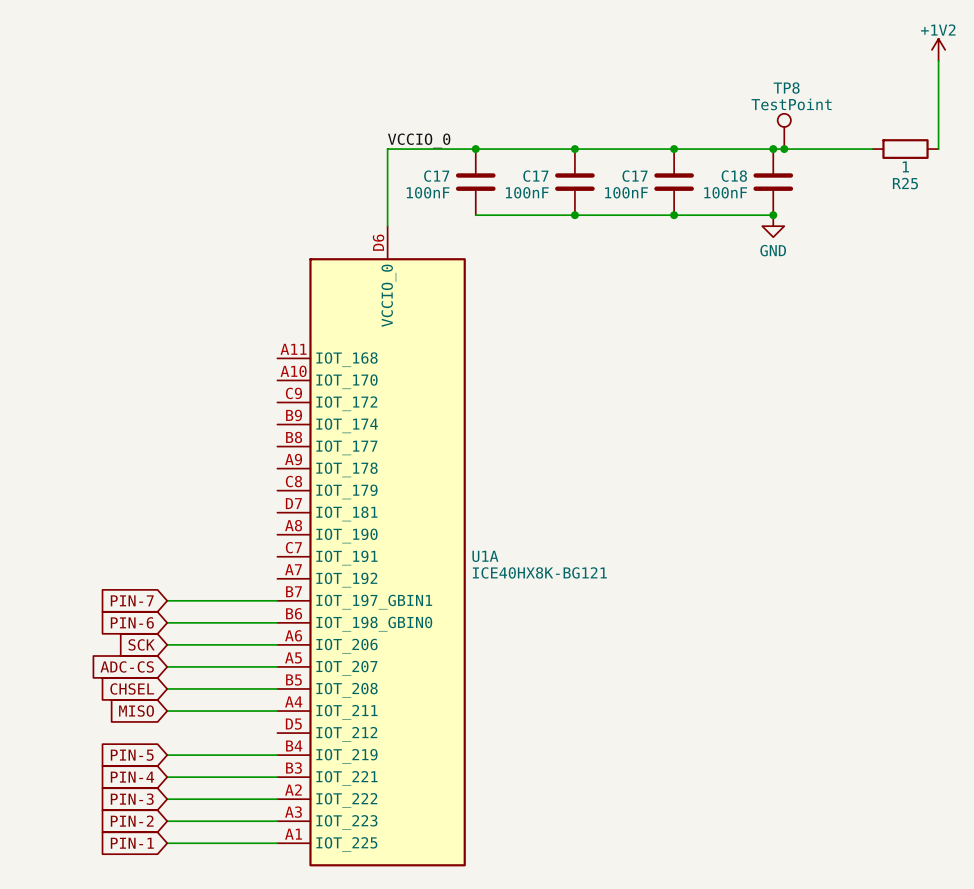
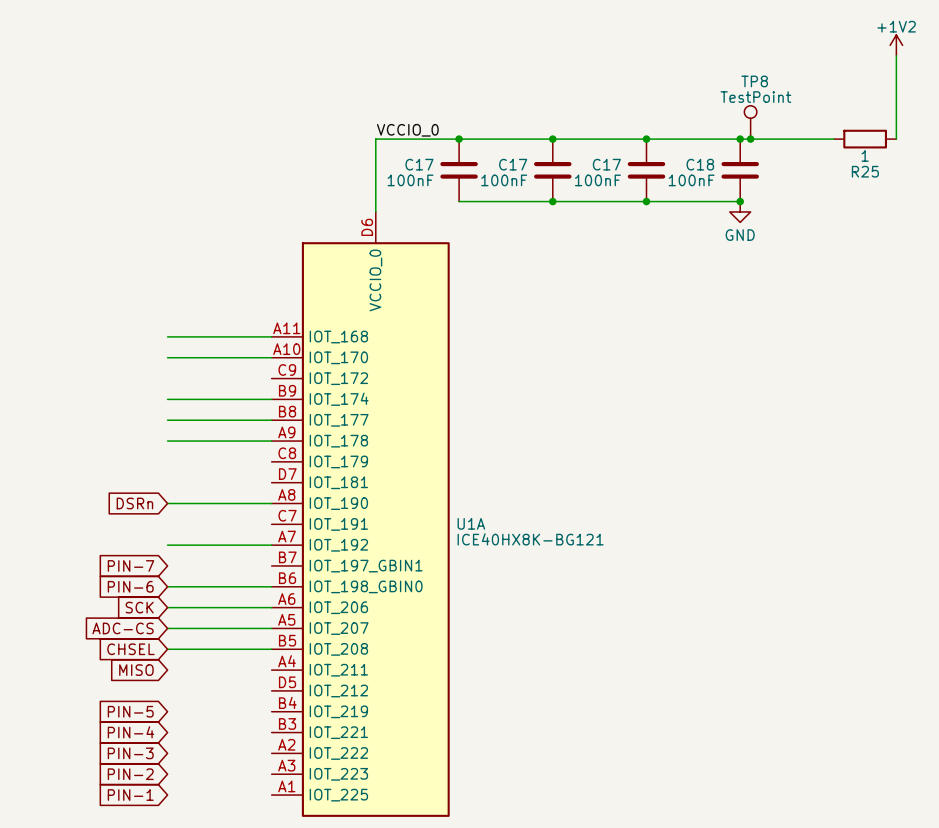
wire: none -> (167, 336) (271, 336)
wire: none -> (167, 357) (271, 357)
wire: none -> (167, 420) (271, 420)
wire: none -> (167, 441) (271, 441)
global label: none -> DSRn (134, 503)
wire: (167, 600) (277, 600) -> (167, 399) (271, 399)
wire: (167, 711) (277, 711) -> (167, 503) (271, 503)
wire: (167, 755) (277, 755) -> (167, 545) (271, 545)
wire: (167, 777) (277, 777) -> none
wire: (167, 799) (277, 799) -> none
wire: (167, 821) (277, 821) -> none
wire: (167, 843) (277, 843) -> none

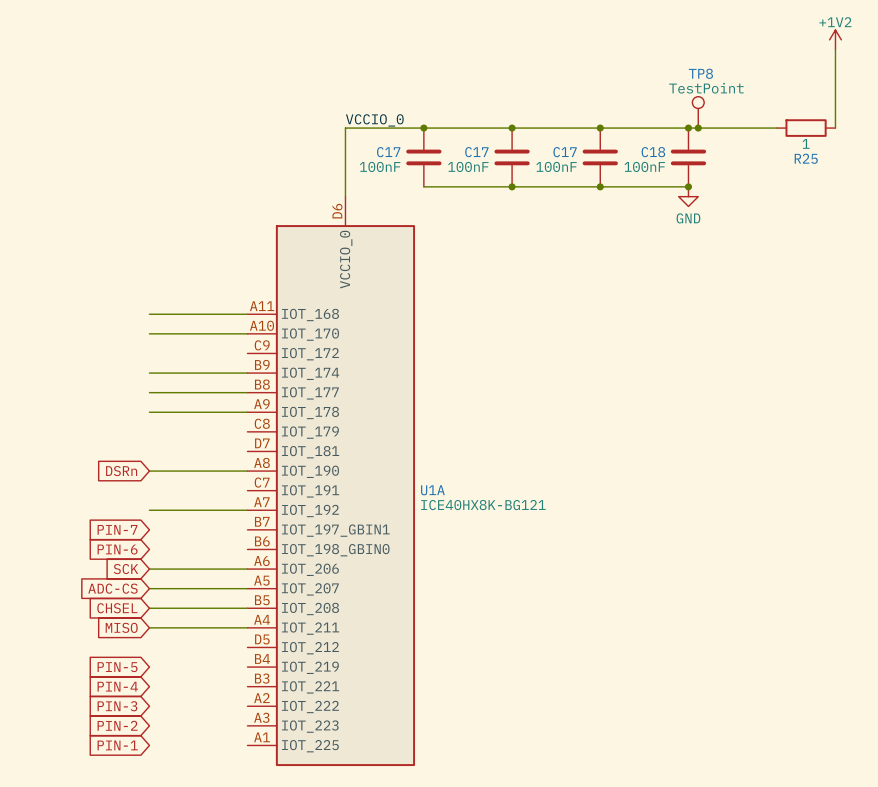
wire: (167, 586) (271, 586) -> (149, 627) (247, 627)

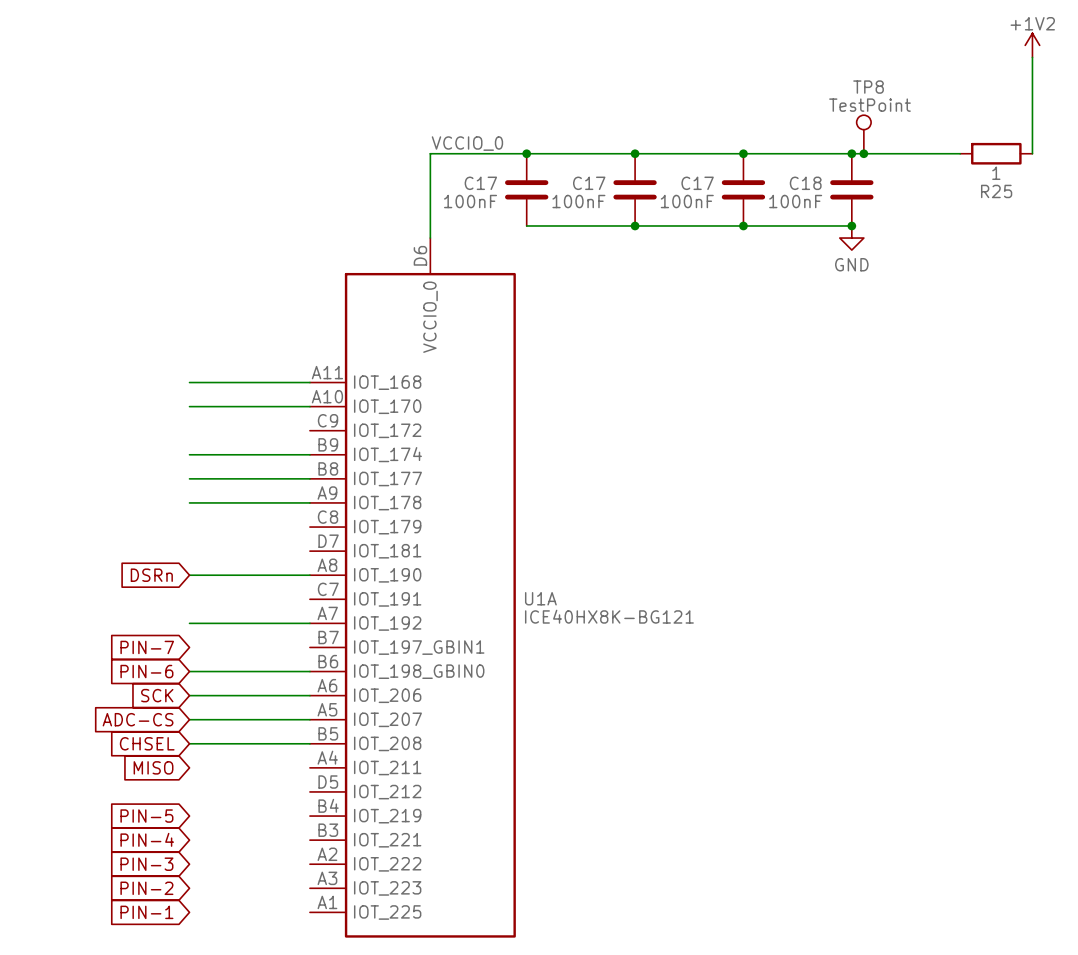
wire: (149, 627) (247, 627) -> (189, 671) (309, 671)

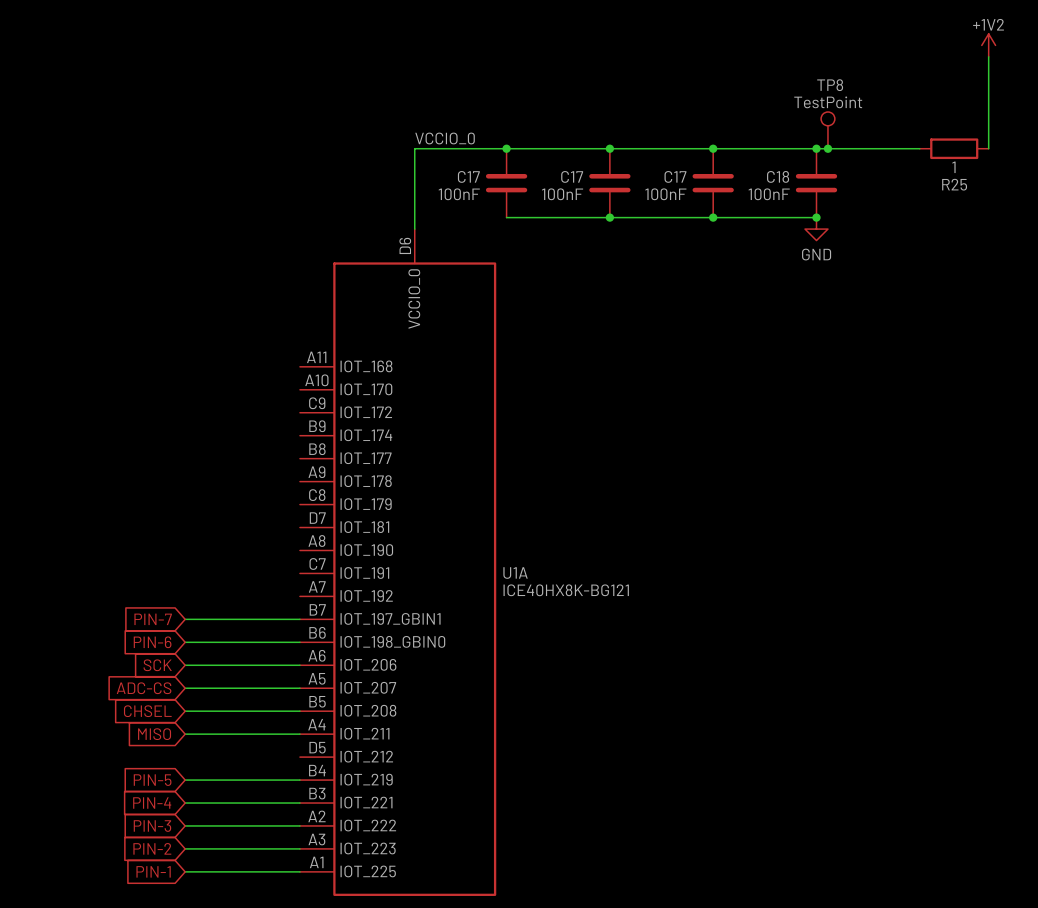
wire: (189, 382) (309, 382) -> none
wire: (189, 406) (309, 406) -> none
wire: (189, 454) (309, 454) -> (185, 619) (299, 619)
wire: (189, 478) (309, 478) -> none
wire: (189, 502) (309, 502) -> none
global label: DSRn (151, 575) -> none
wire: (189, 575) (309, 575) -> (185, 734) (299, 734)
wire: (189, 623) (309, 623) -> (185, 780) (299, 780)
wire: none -> (185, 803) (299, 803)
wire: none -> (185, 825) (299, 825)
wire: none -> (185, 848) (299, 848)
wire: none -> (185, 871) (299, 871)

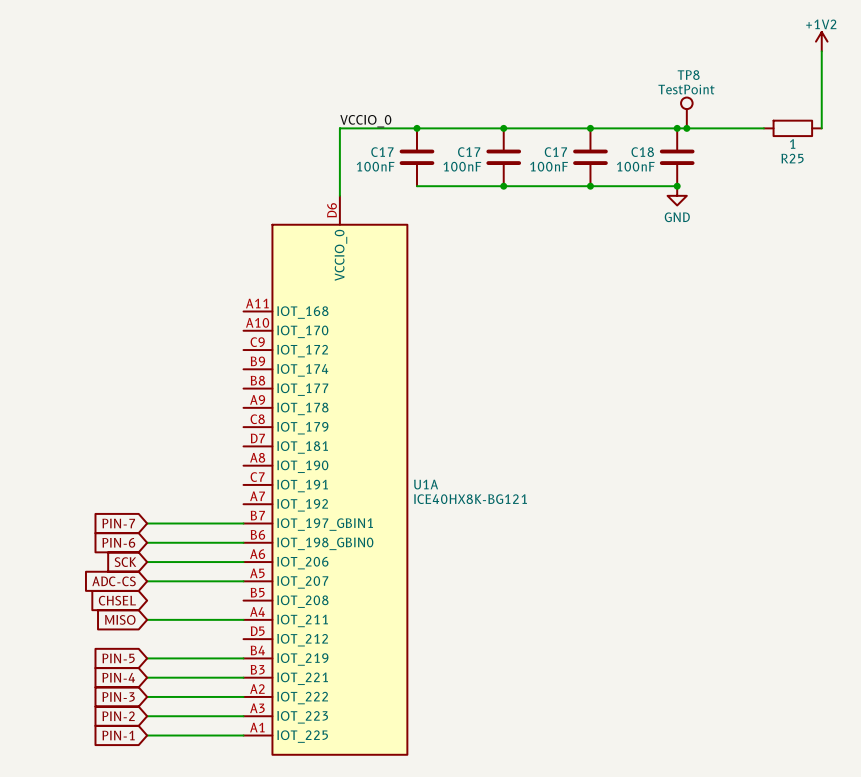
wire: (185, 711) (299, 711) -> none

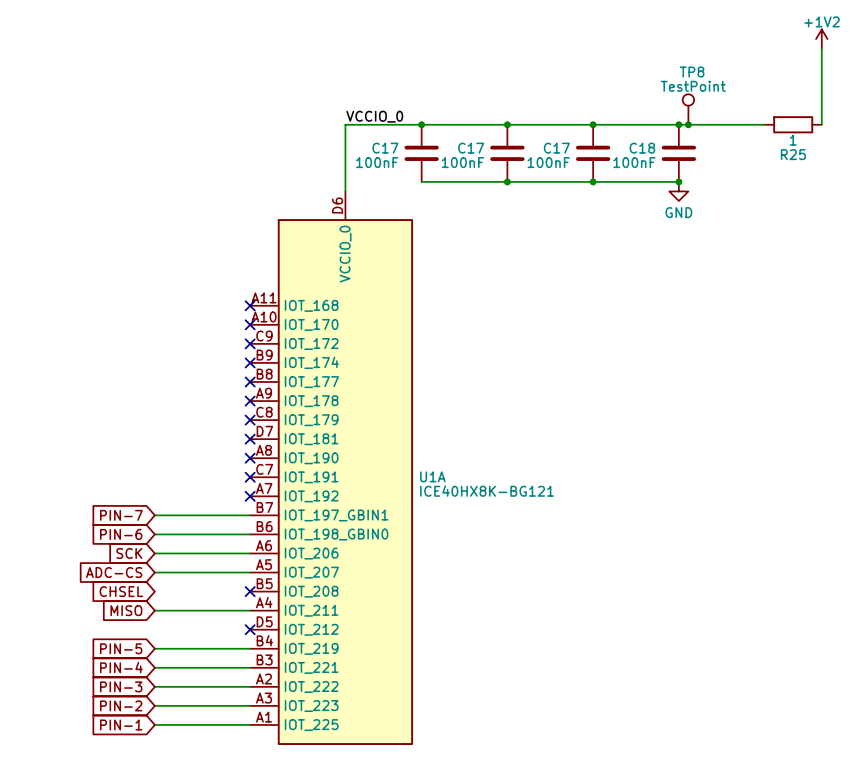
no-connect mark: none -> (250, 305)
no-connect mark: none -> (250, 324)
no-connect mark: none -> (250, 343)
no-connect mark: none -> (250, 362)
no-connect mark: none -> (250, 381)
no-connect mark: none -> (250, 401)
no-connect mark: none -> (250, 420)
no-connect mark: none -> (250, 439)
no-connect mark: none -> (250, 458)
no-connect mark: none -> (250, 477)
no-connect mark: none -> (250, 496)
no-connect mark: none -> (250, 591)
no-connect mark: none -> (250, 629)

